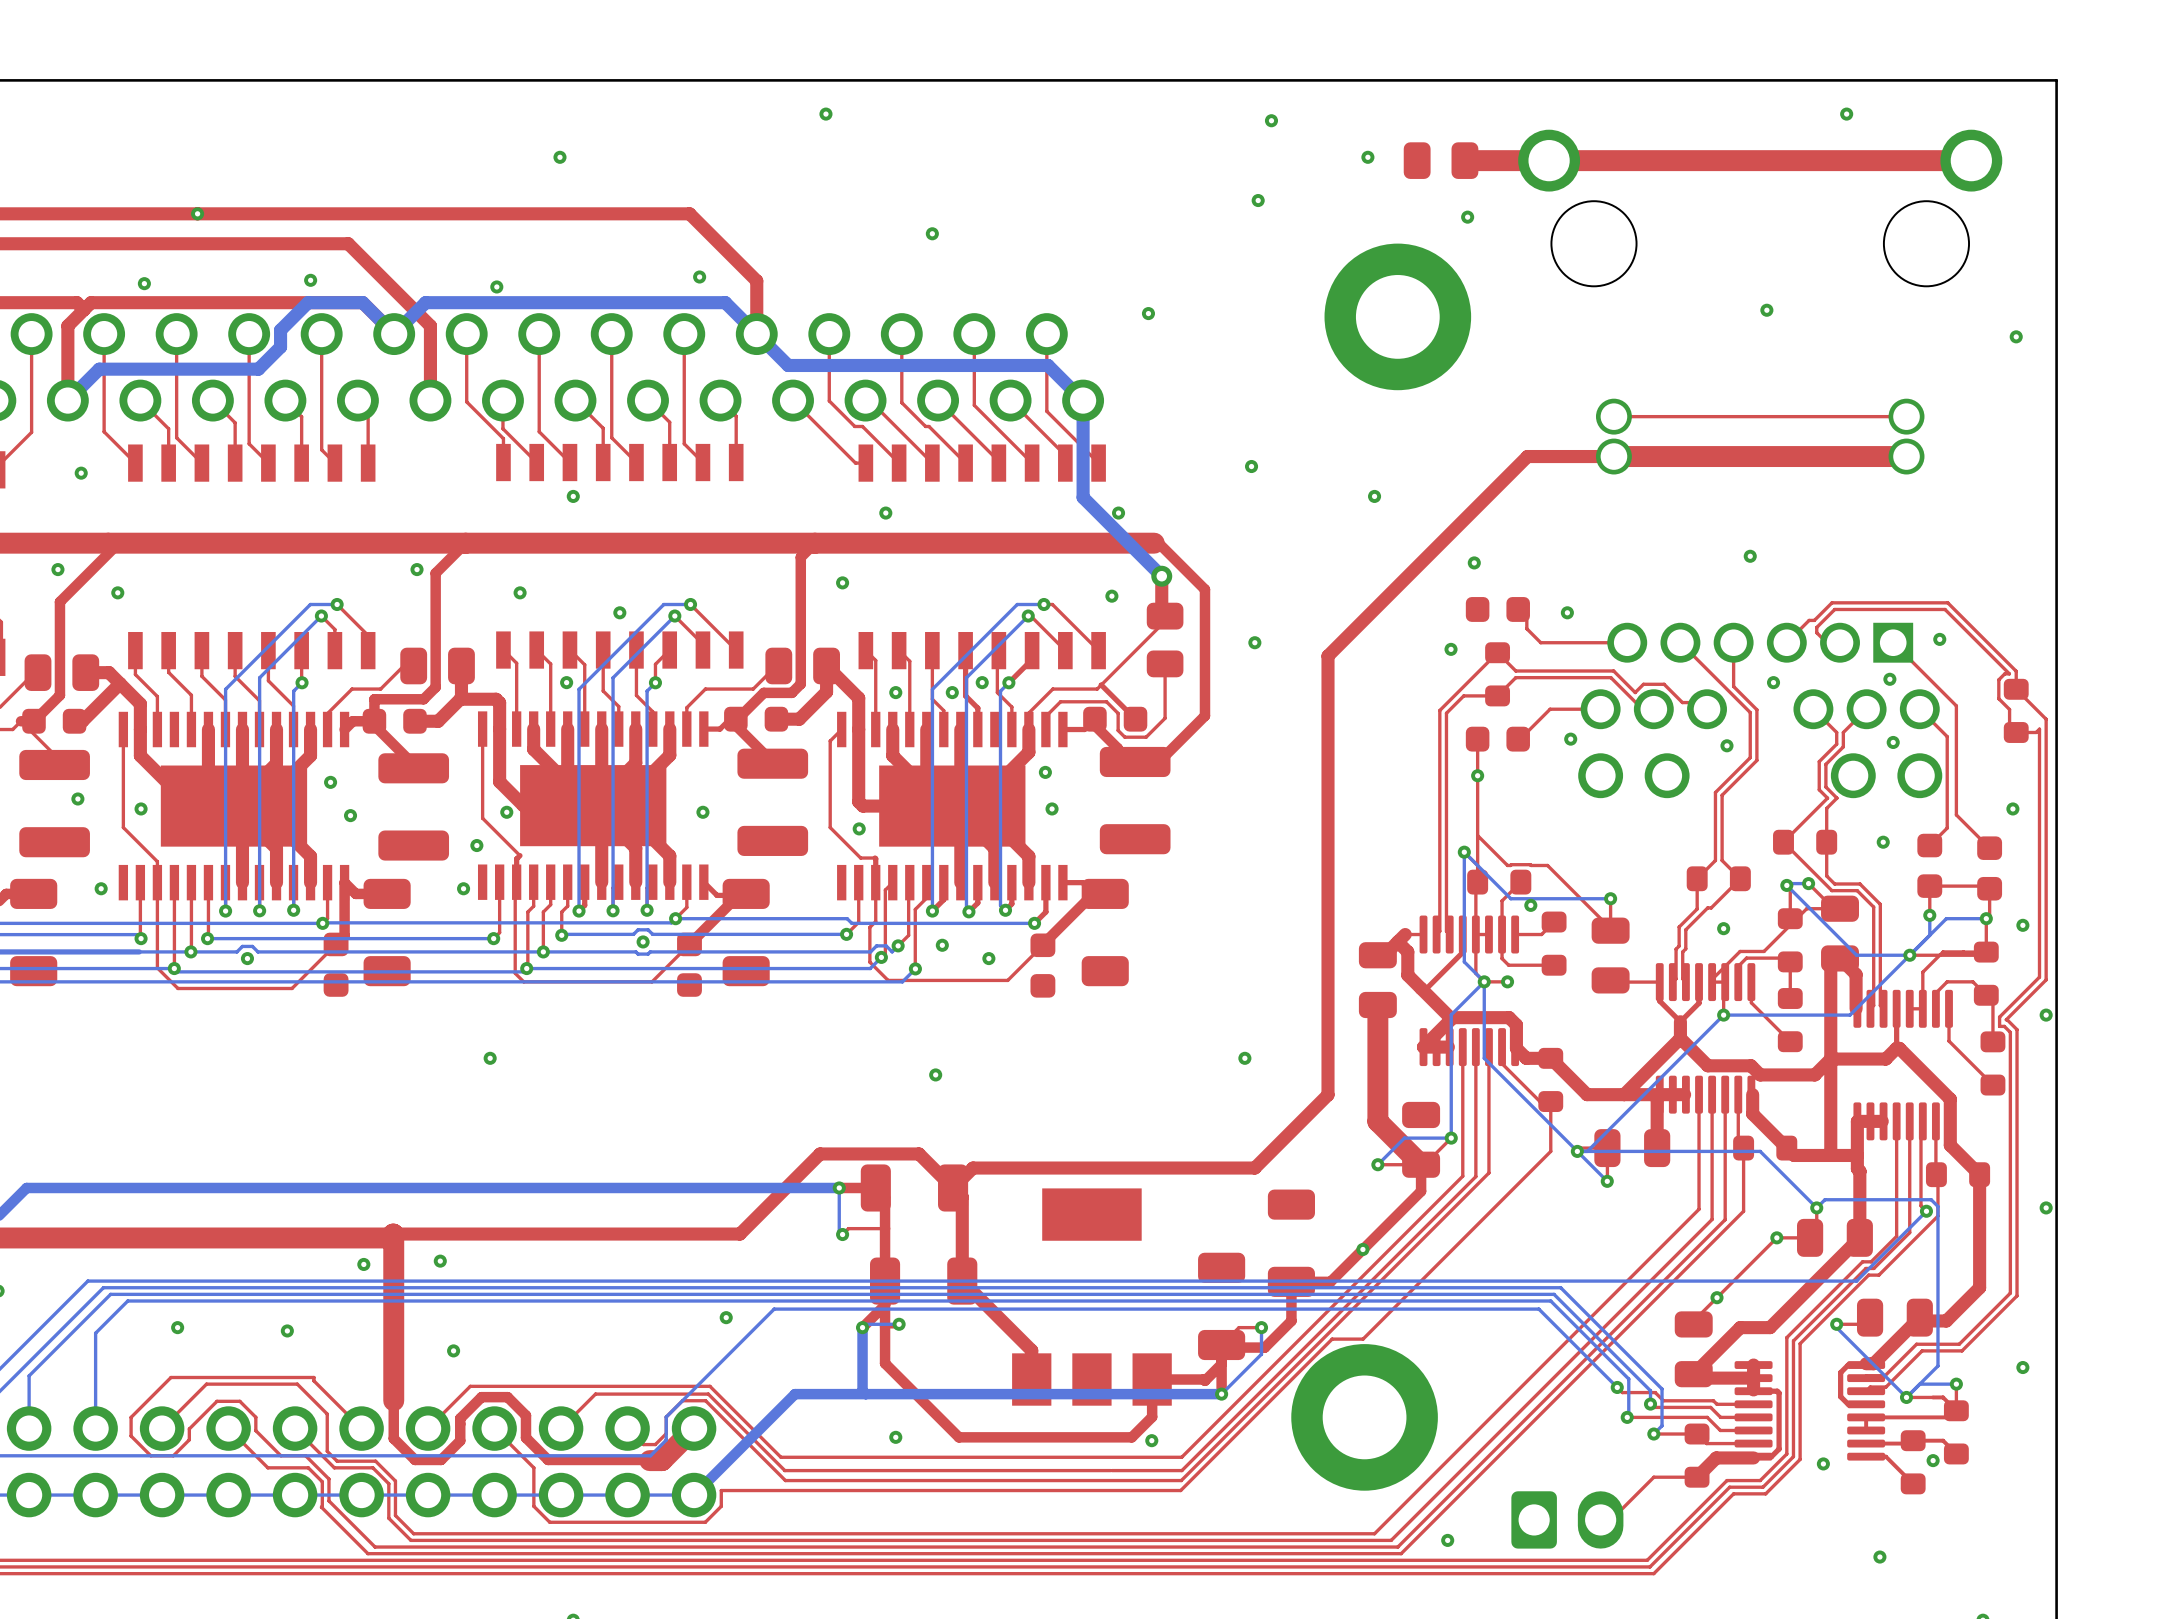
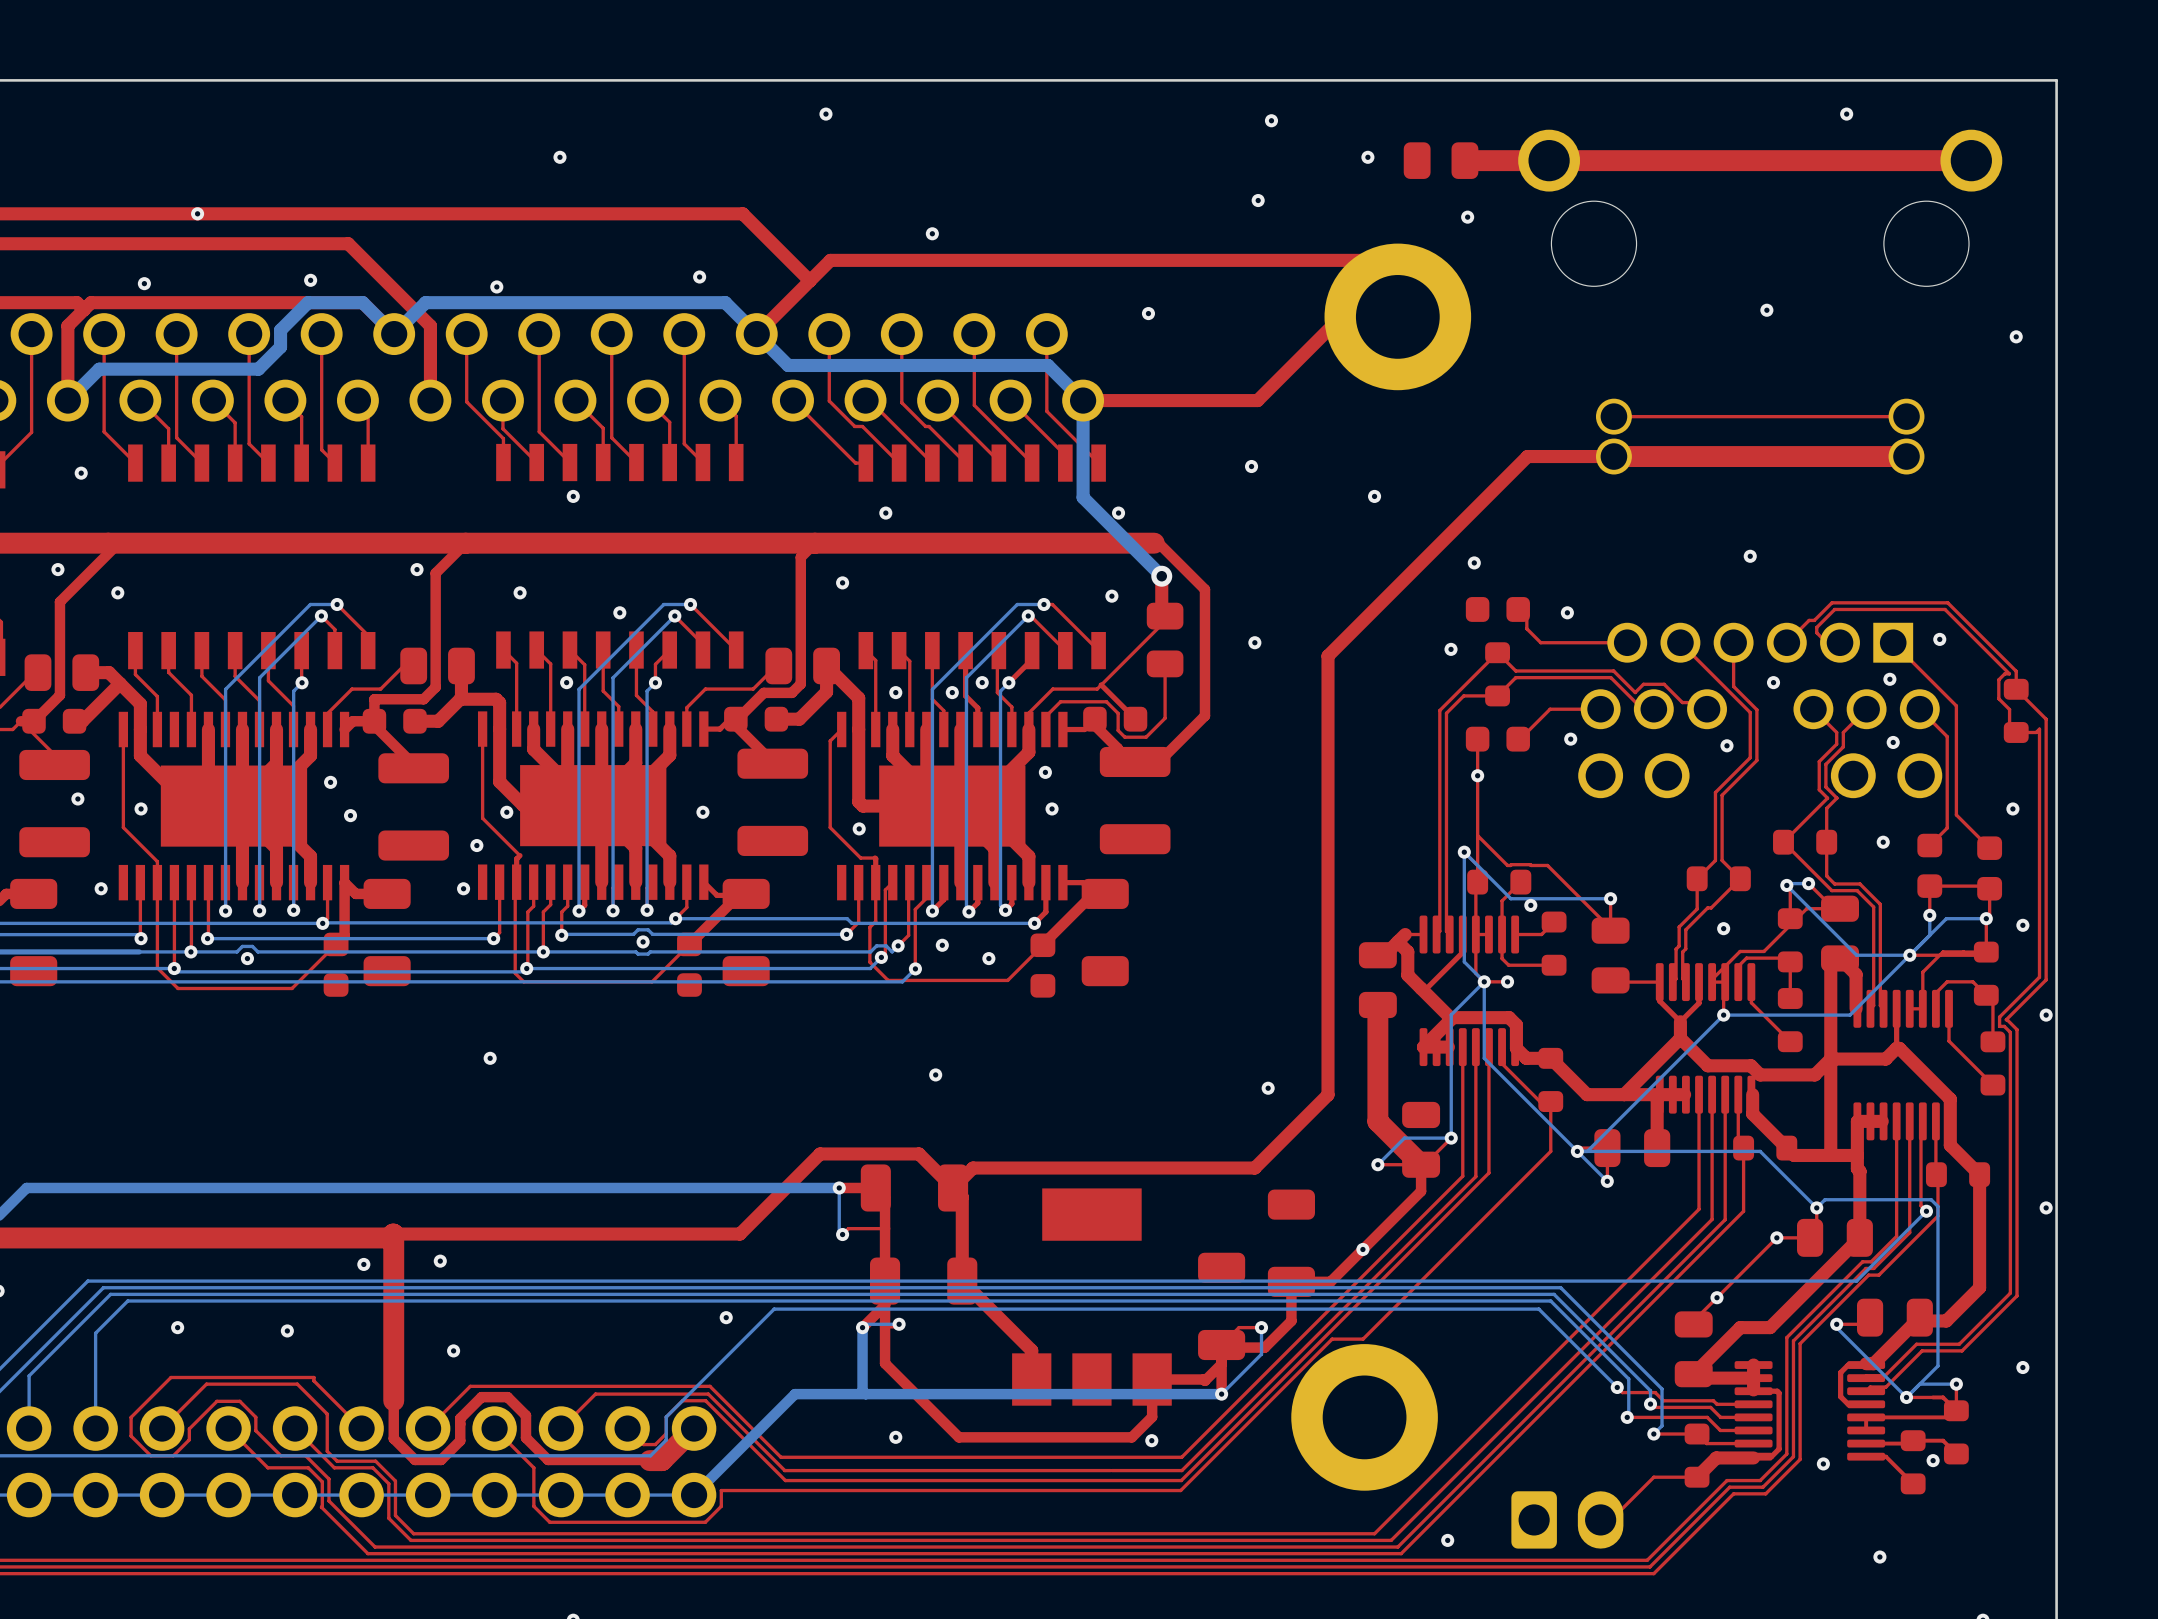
top track: (689, 213) (756, 280) (756, 334) -> (689, 213) (742, 213) (809, 280)
top track: none -> (756, 334) (830, 260) (1397, 260) (1257, 400) (1083, 400)
via position: (1244, 1058) -> (1268, 1088)

